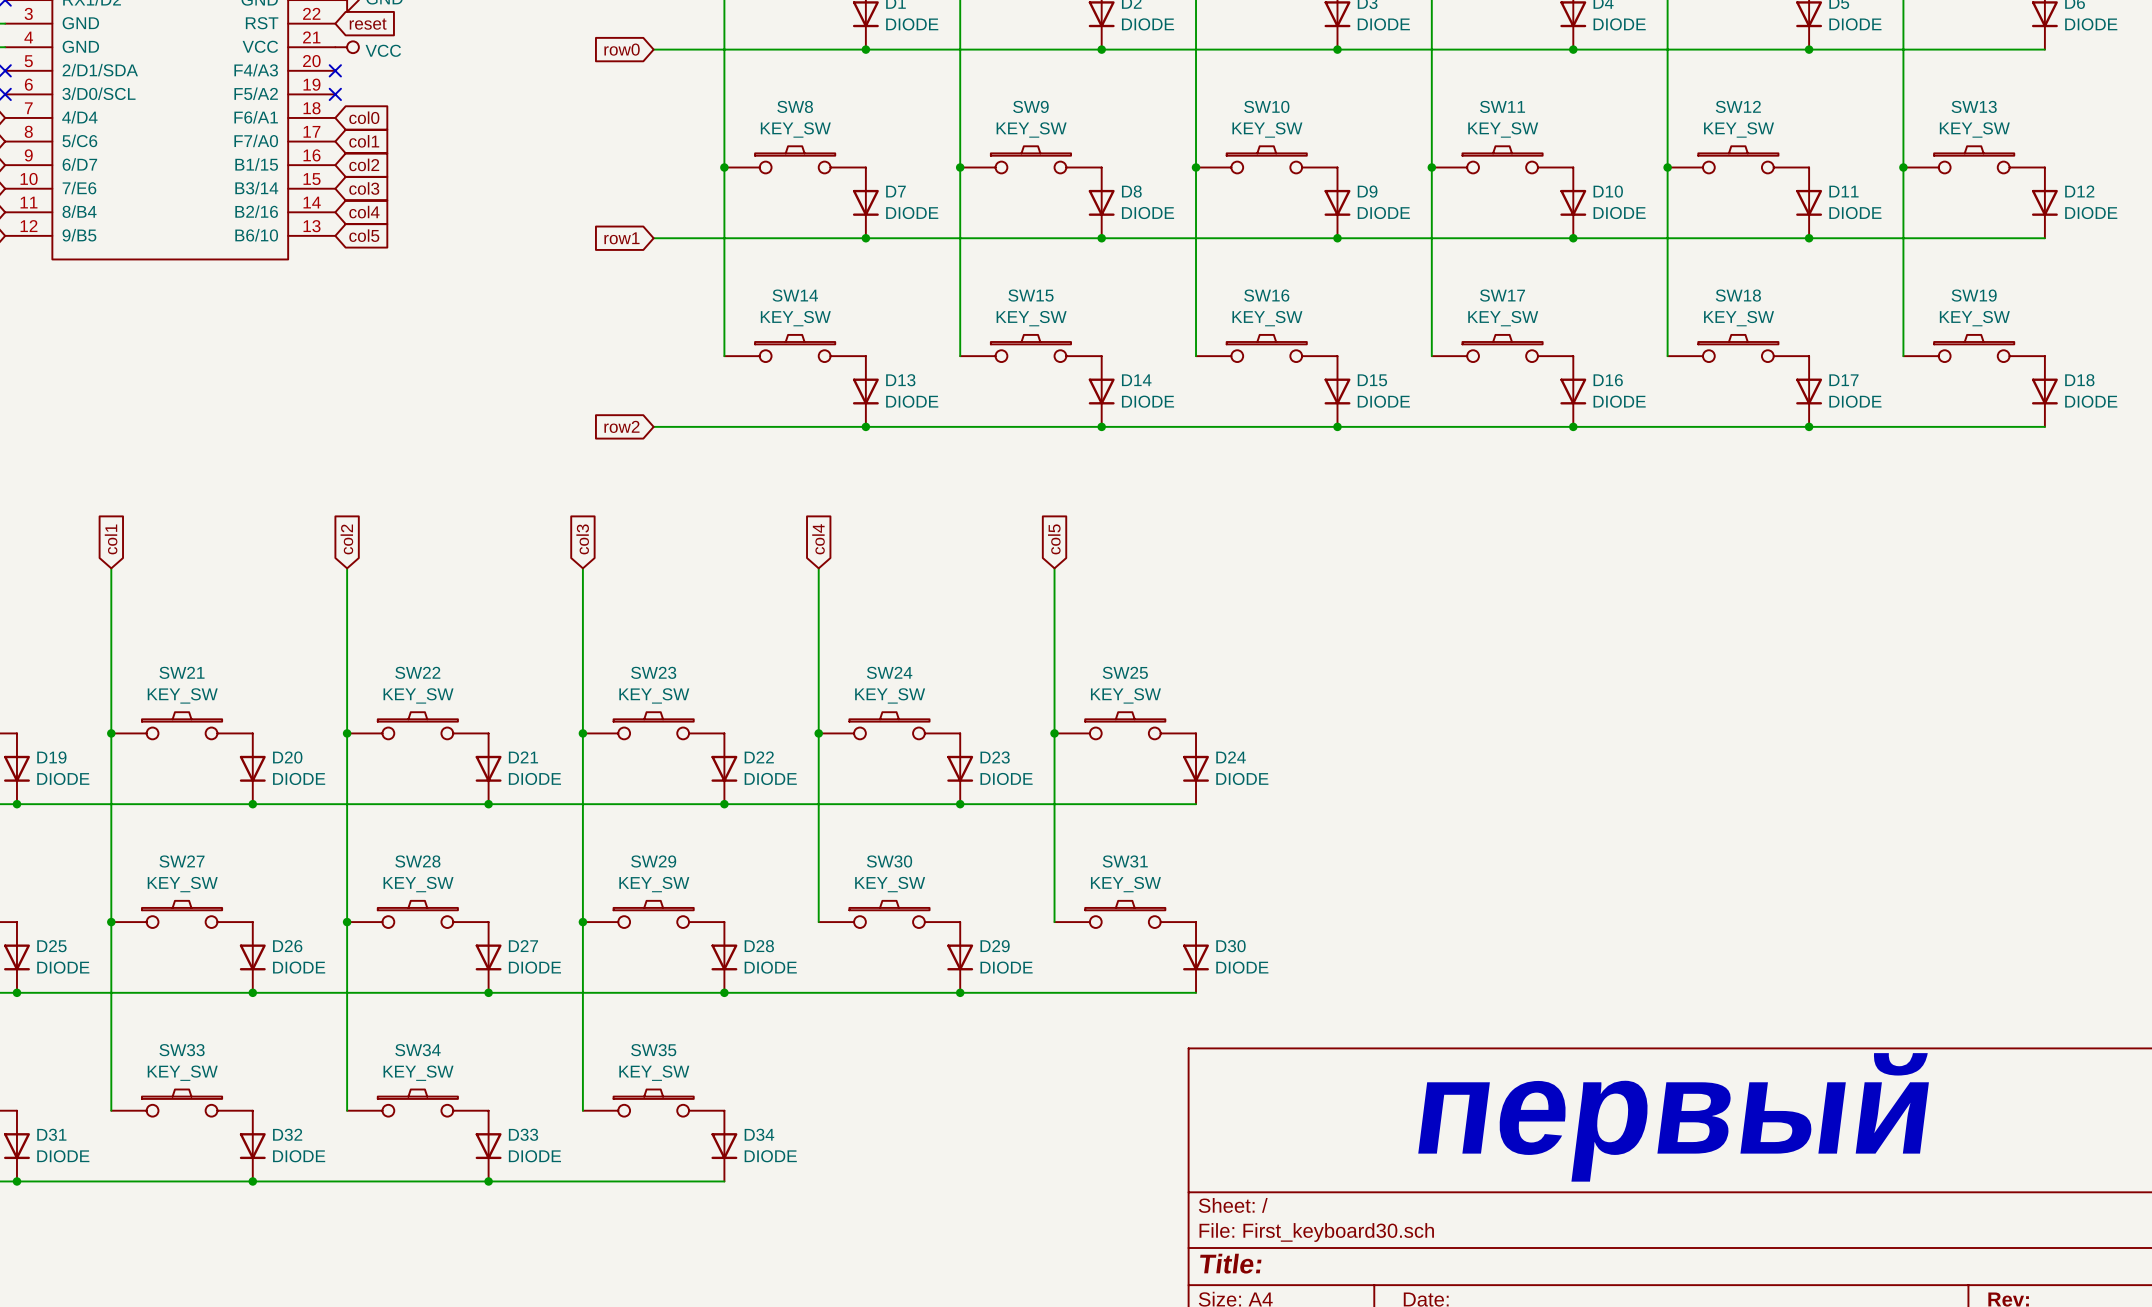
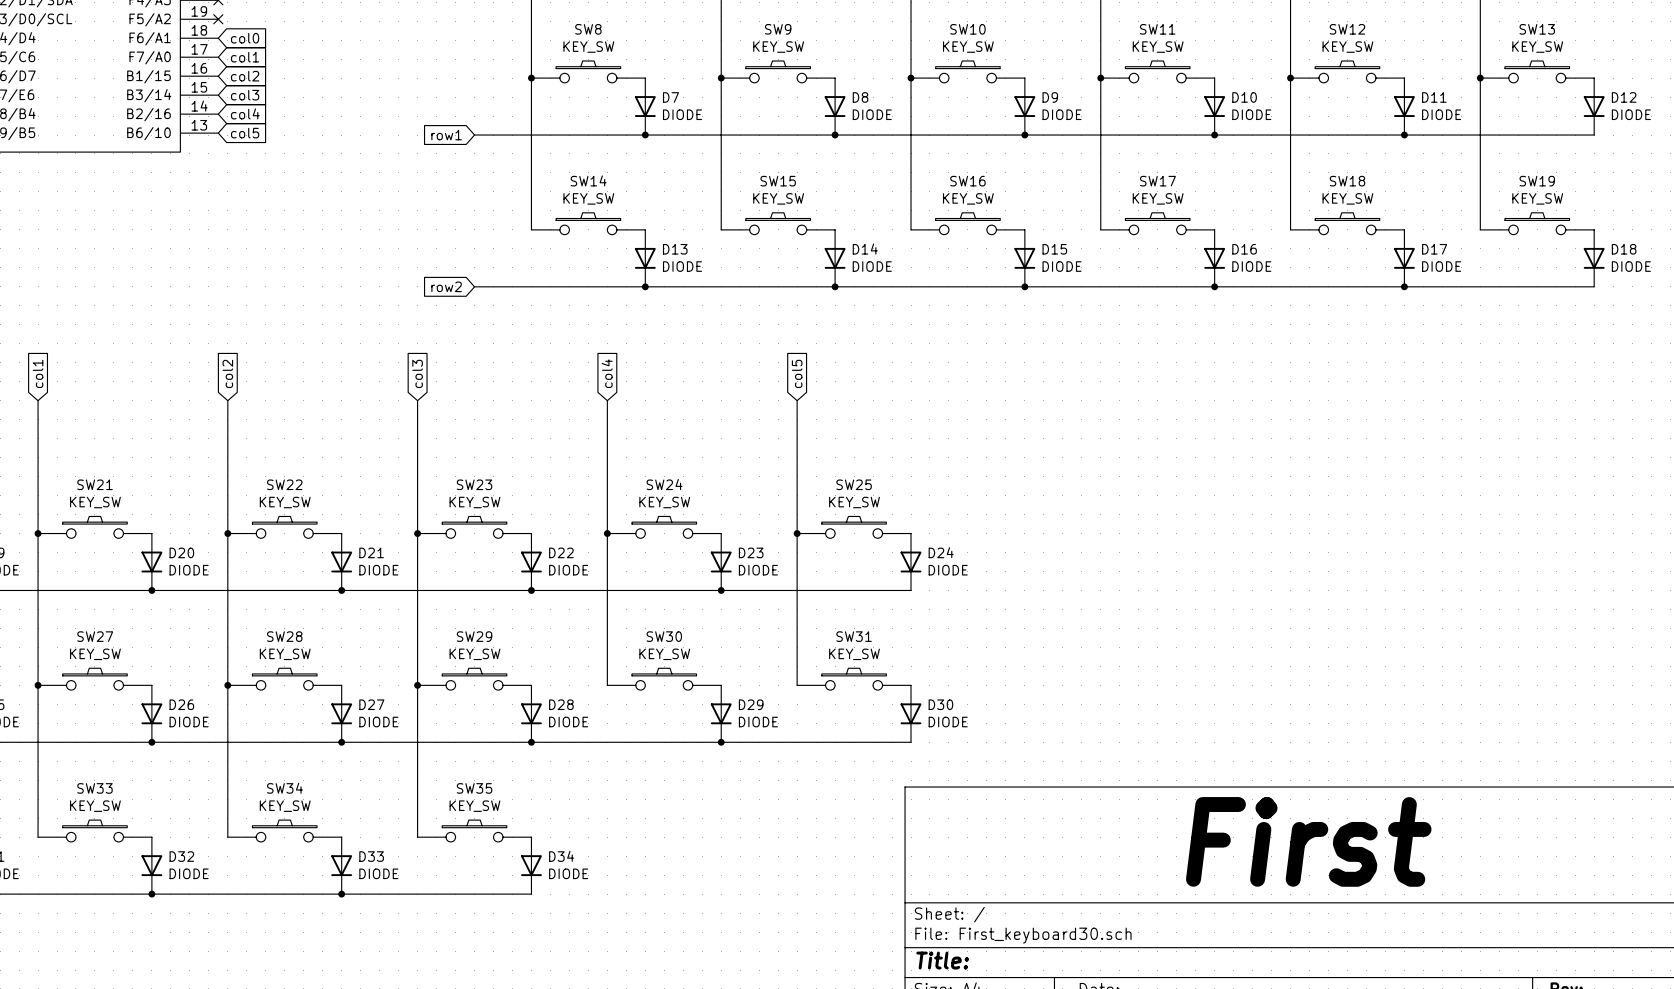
text: none -> First (1308, 841)
text: первый (1673, 1117) -> none

